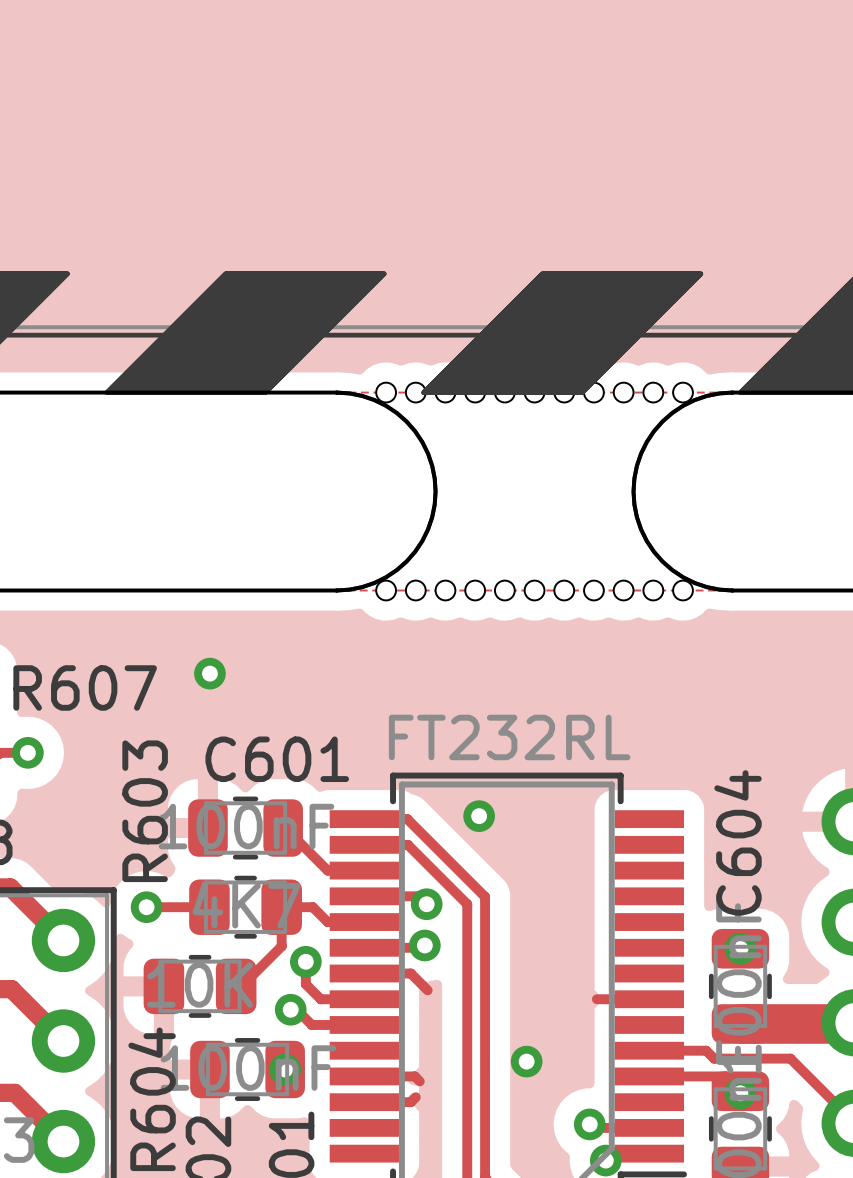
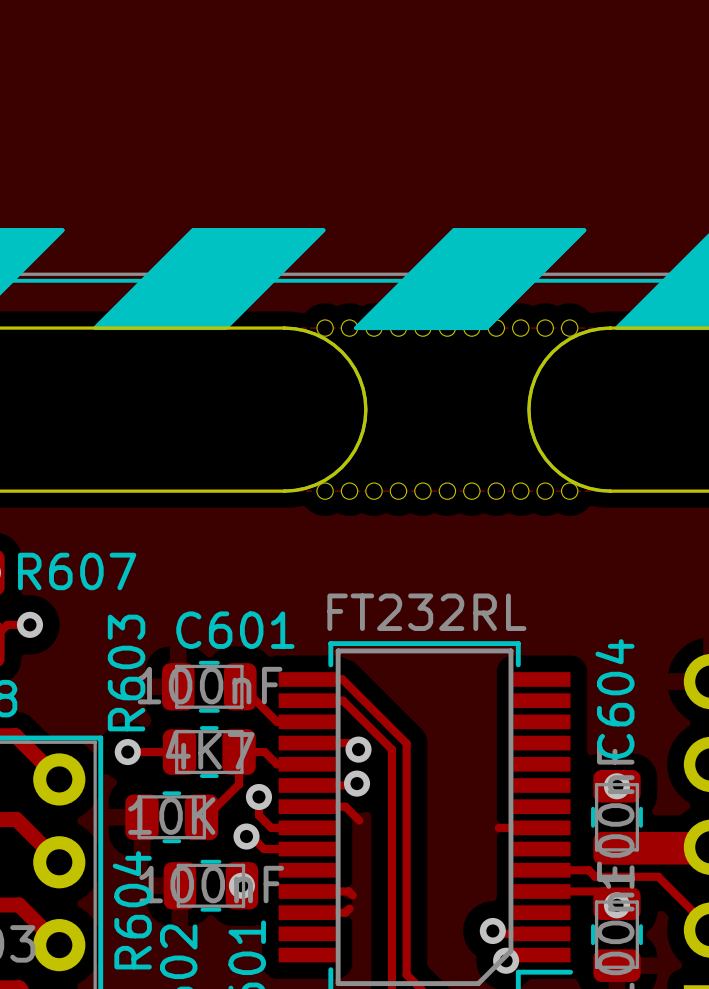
via: (209, 673) -> none
via: (479, 816) -> none
via: (526, 1061) -> none

